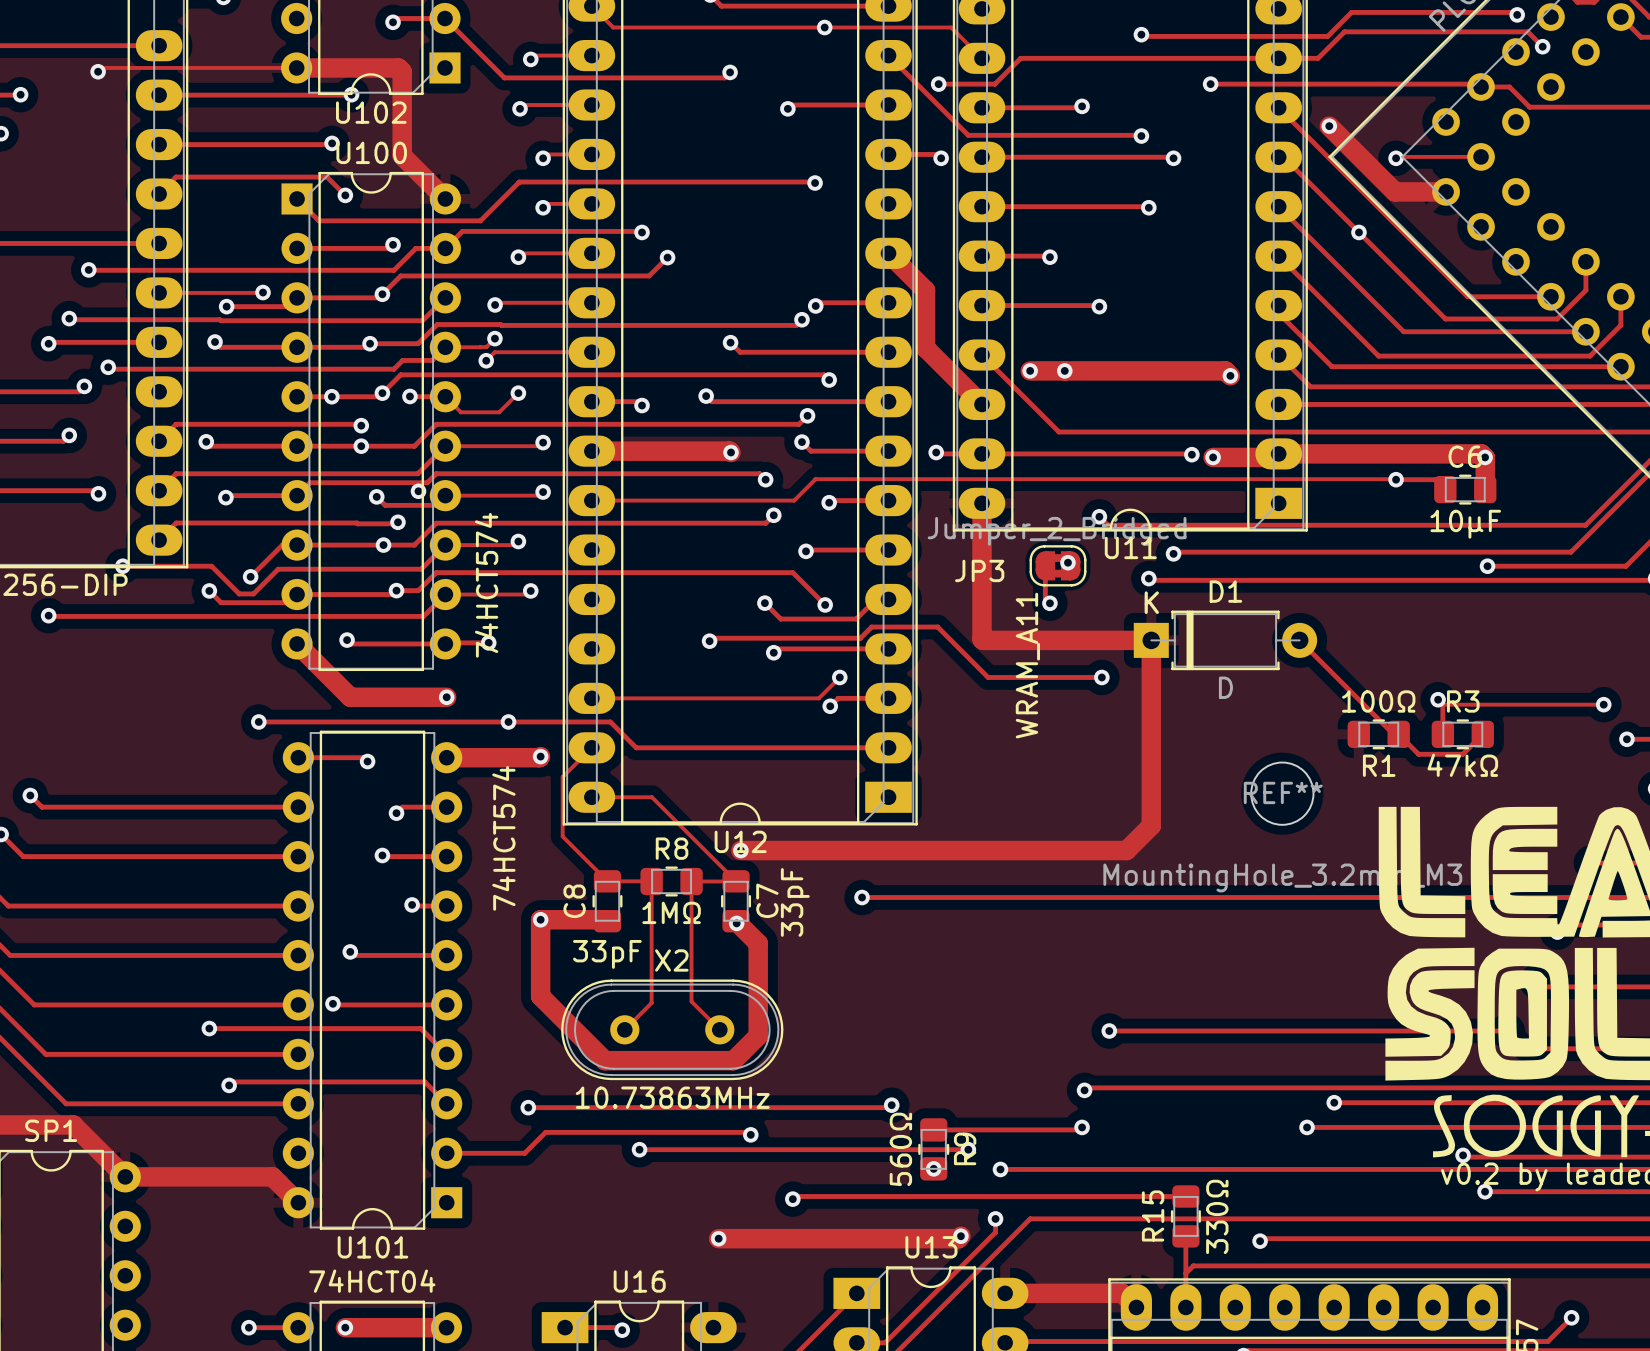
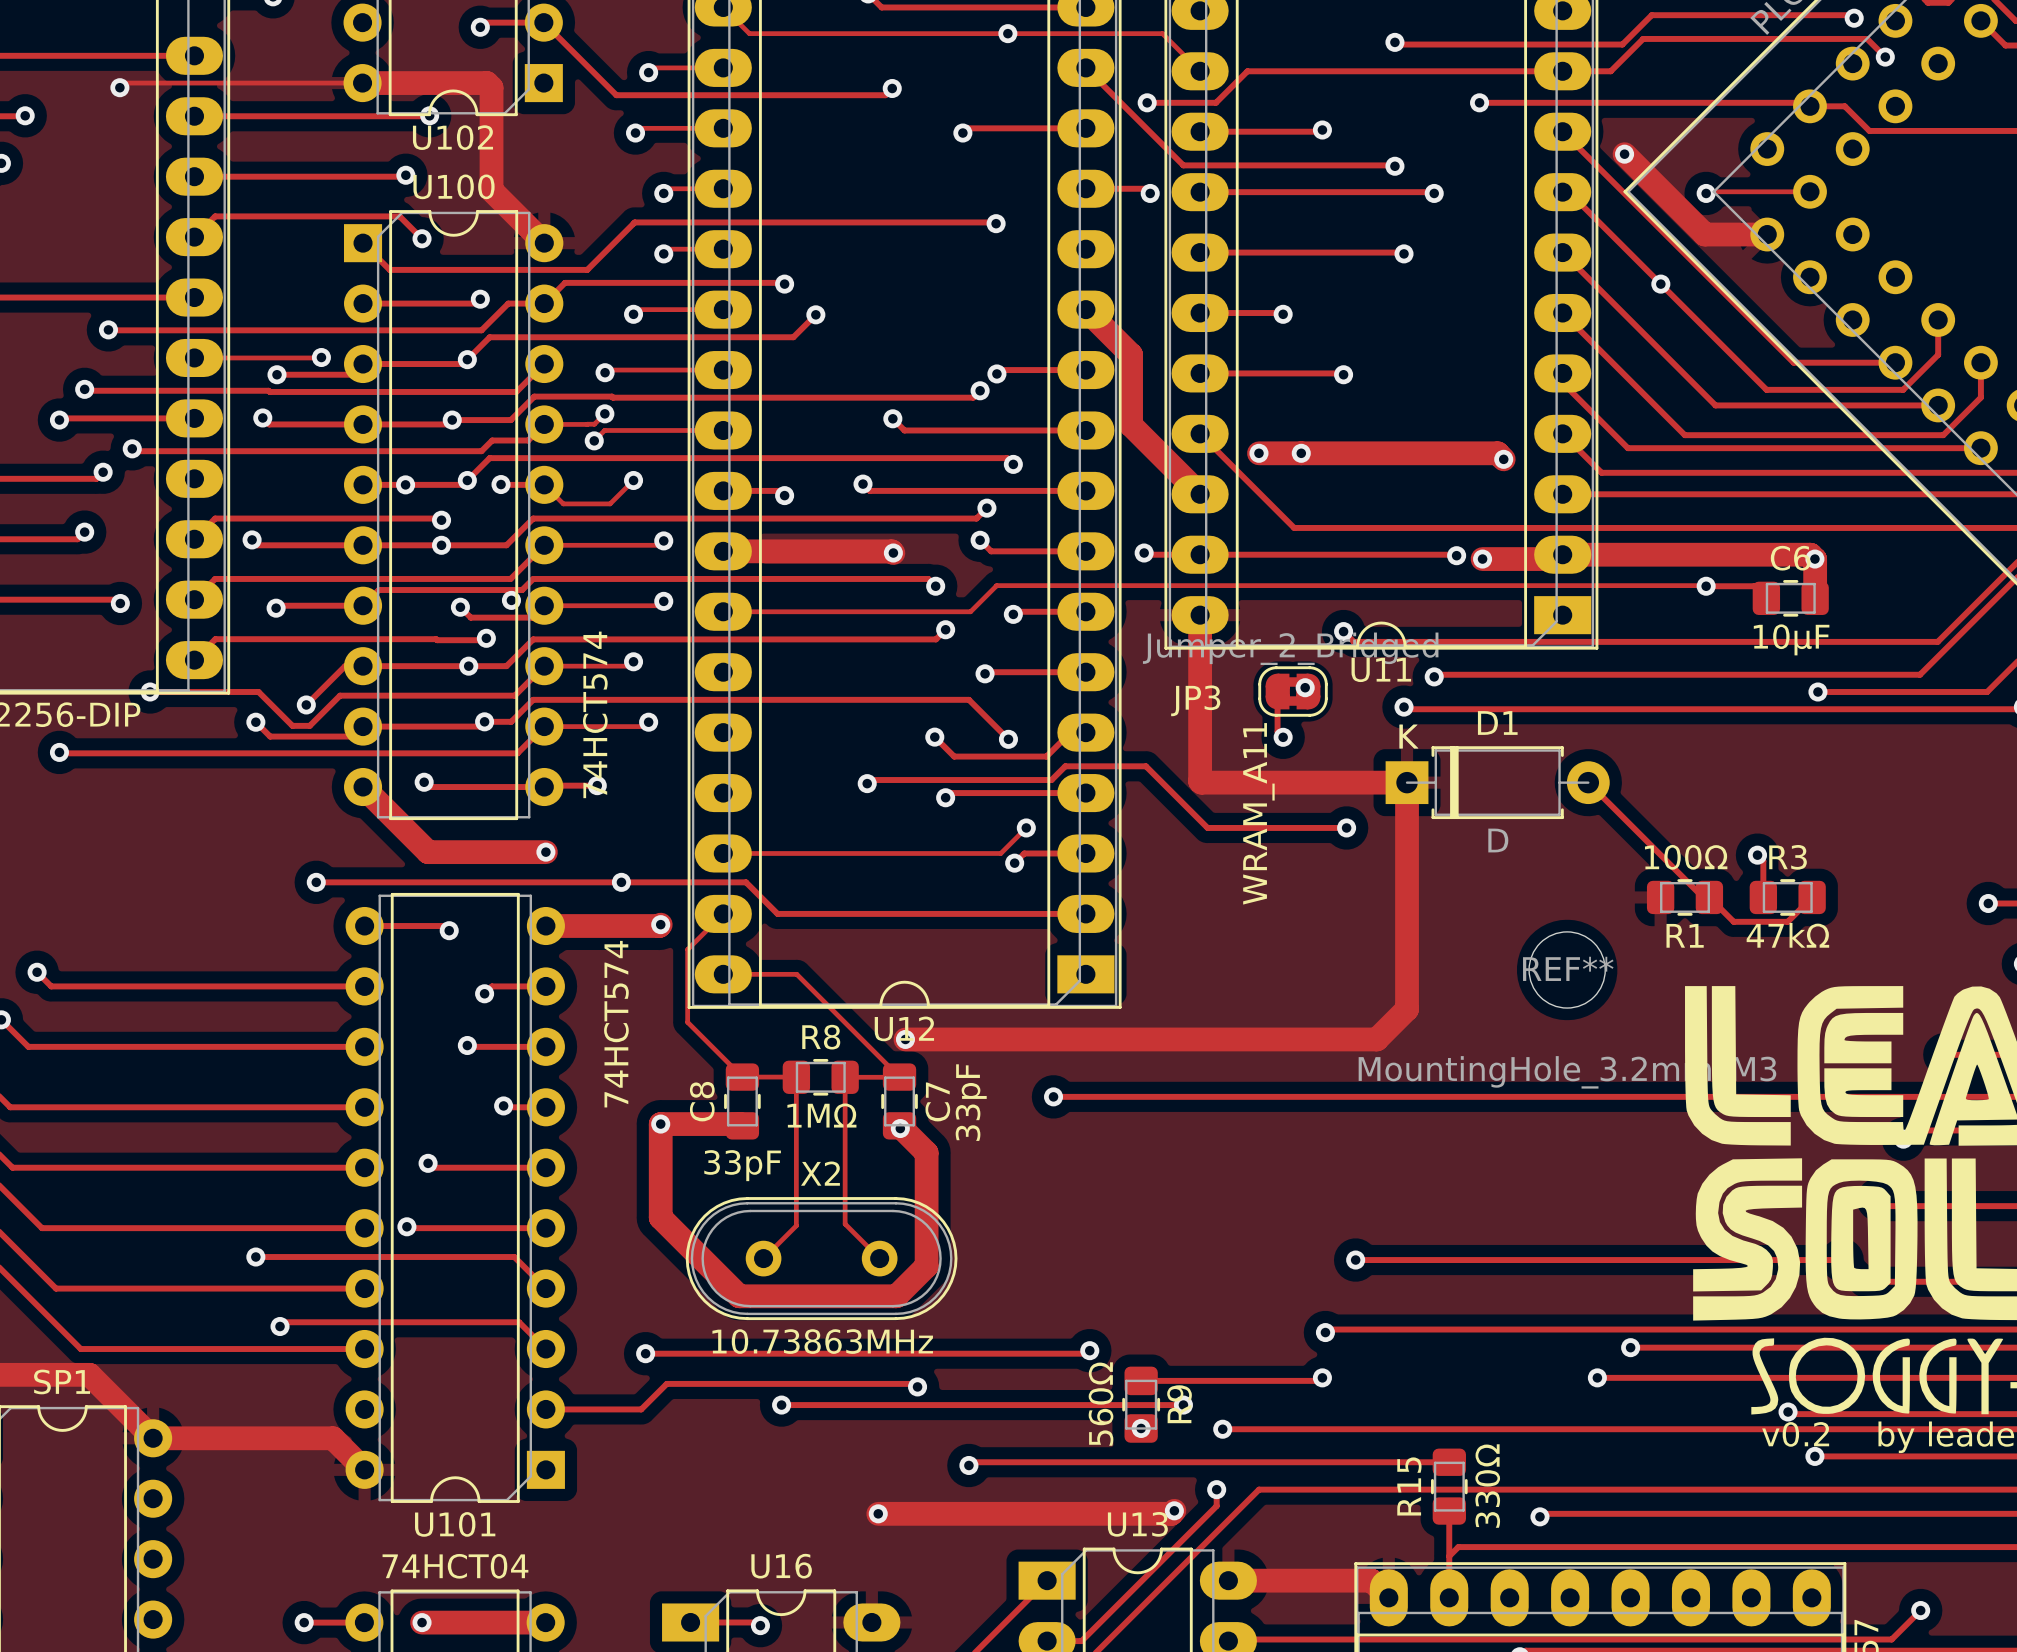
track: (1438, 699) (1443, 704) (1603, 704) -> none
via: (1603, 704) -> none

